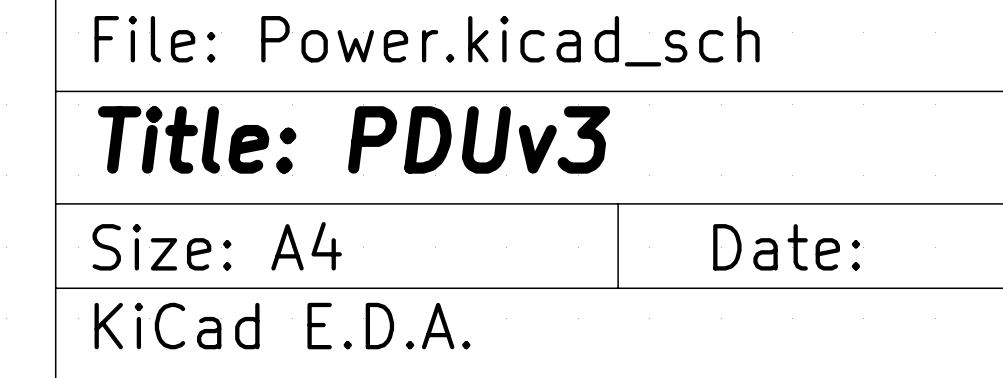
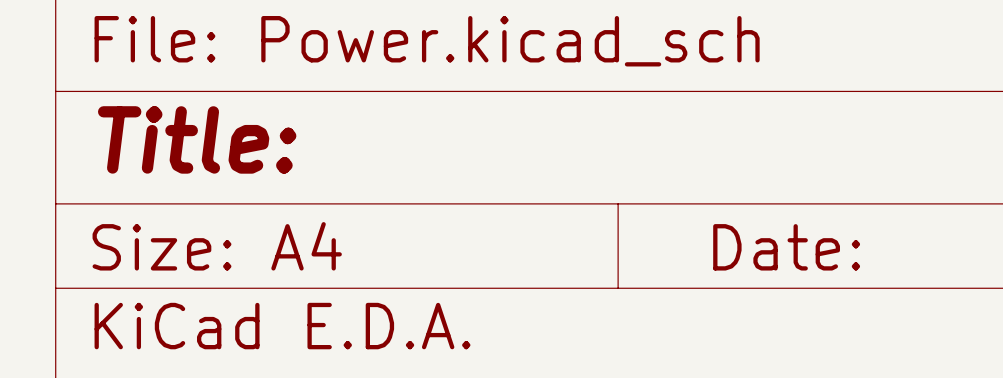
title block: Title: PDUv3 (354, 139) -> Title: (197, 139)

